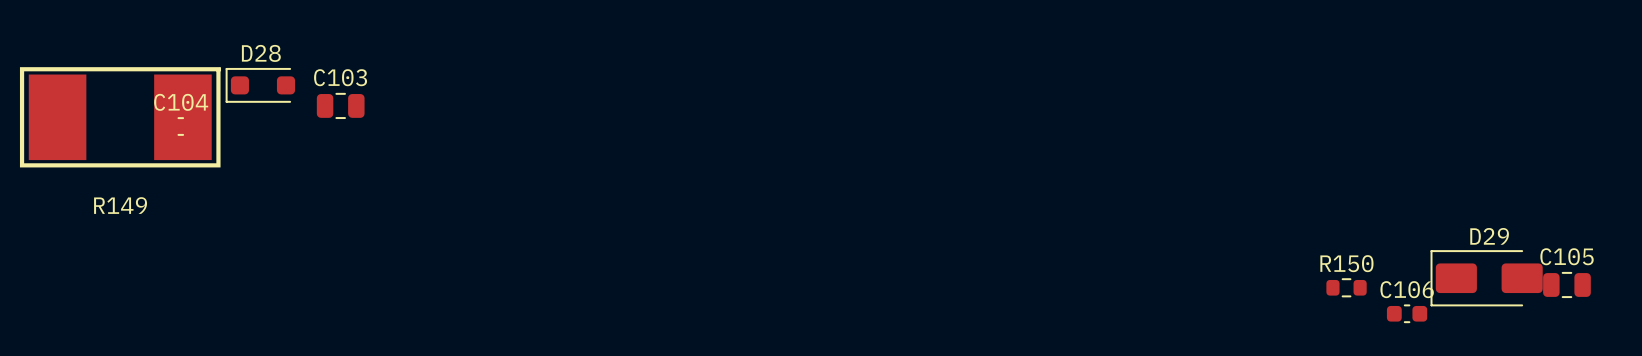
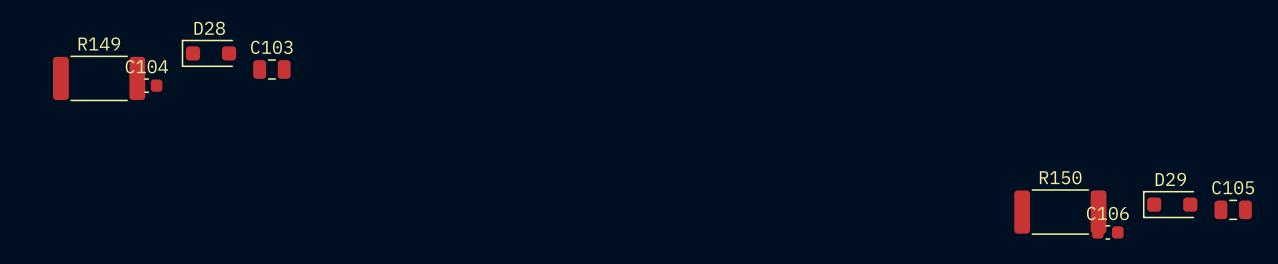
R149 footprint: [19, 67, 221, 168] -> [53, 55, 146, 102]
R149 name position: R149 (120, 205) -> R149 (99, 43)
D29 footprint: [1430, 250, 1543, 307] -> [1142, 190, 1198, 219]
R150 footprint: [1326, 278, 1367, 298] -> [1014, 189, 1107, 235]

